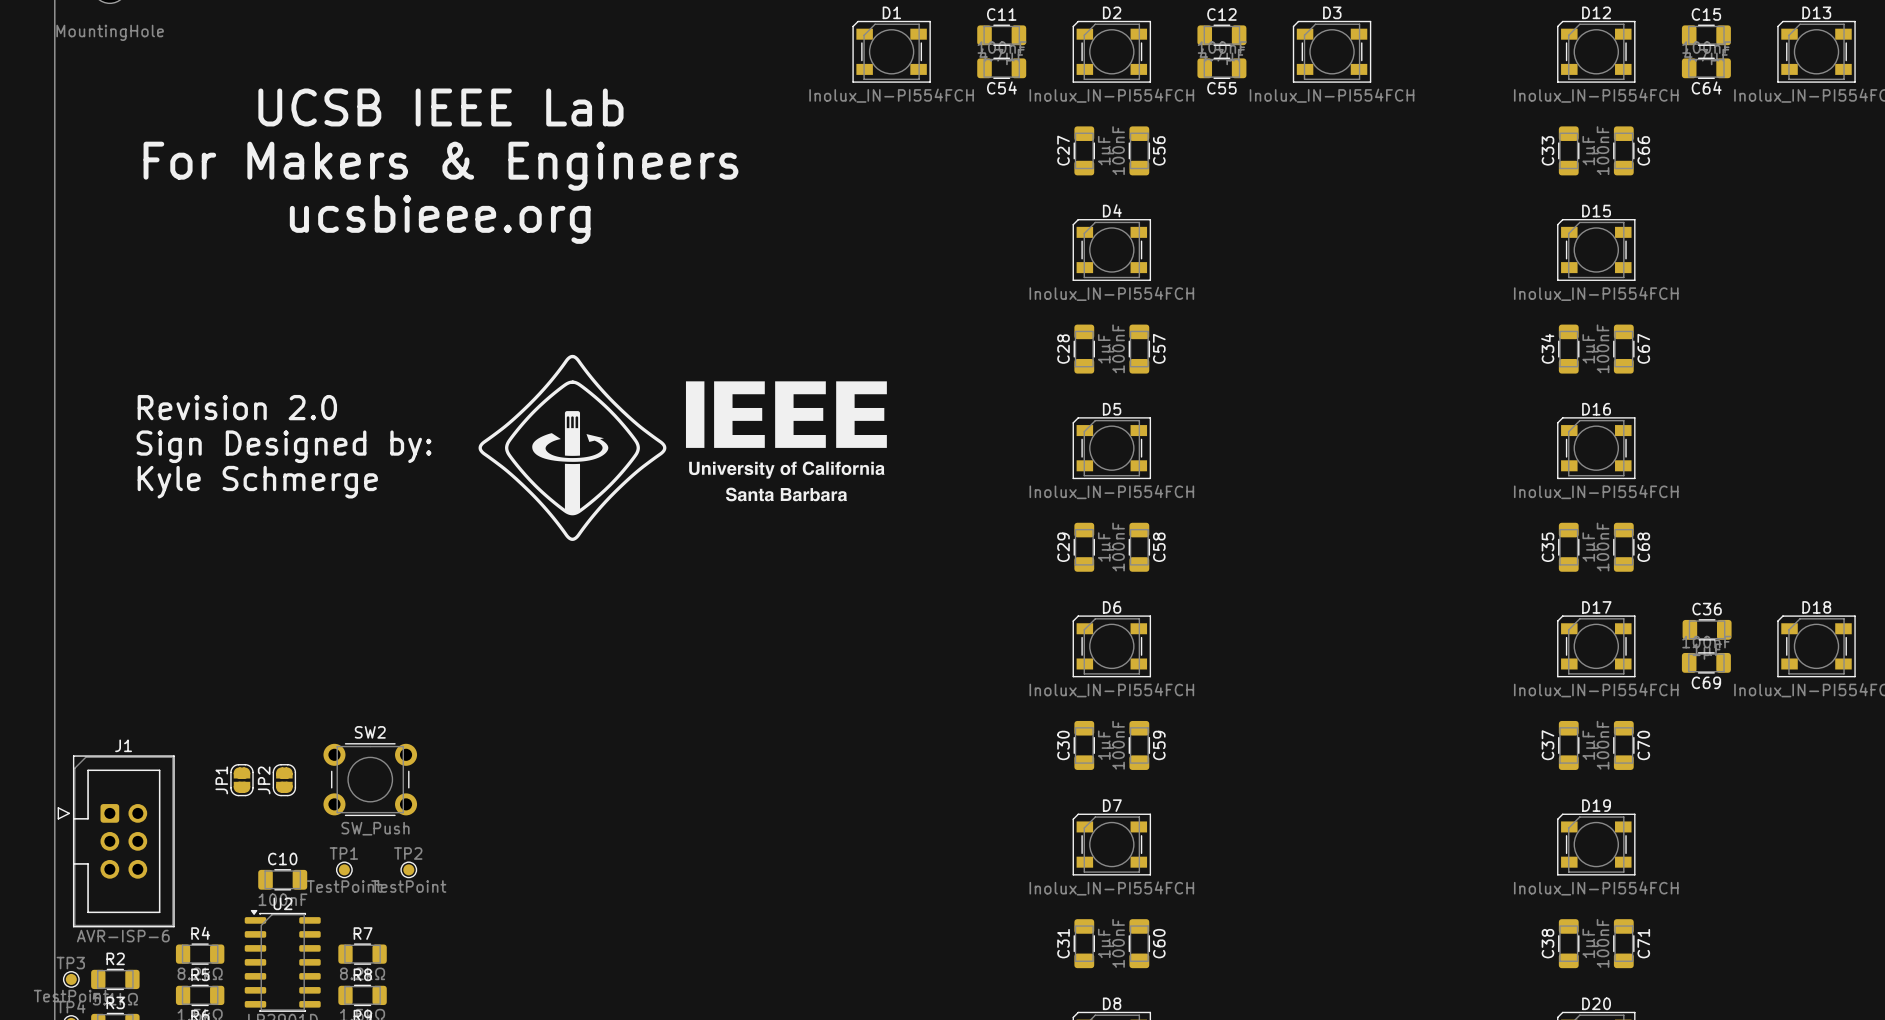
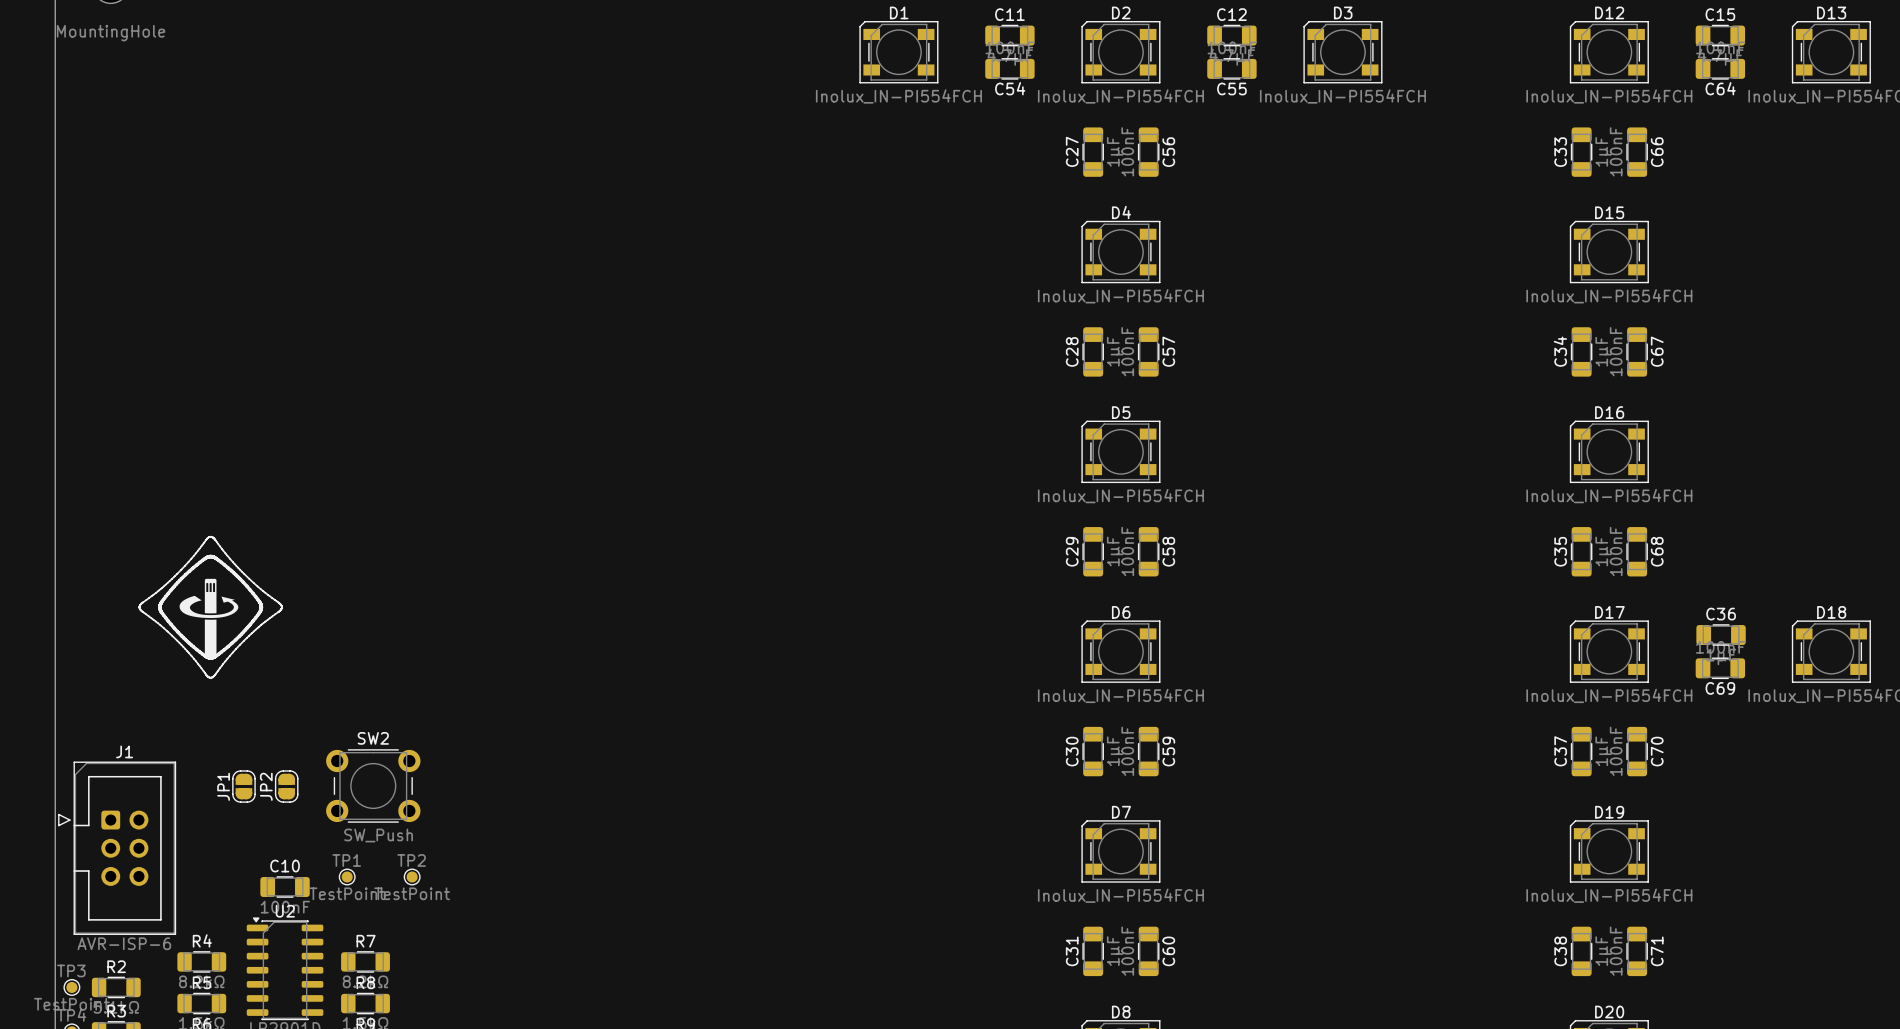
text: UCSB IEEE Lab (440, 107) -> none
text: For Makers & Engineers (440, 166) -> none
text: ucsbieee.org (440, 219) -> none
drawing: [478, 354, 887, 541] -> none
text: Revision 2.0 (237, 407) -> none
text: Sign Designed by: (284, 446) -> none
text: Kyle Schmerge (257, 482) -> none
drawing: none -> [138, 535, 283, 679]

